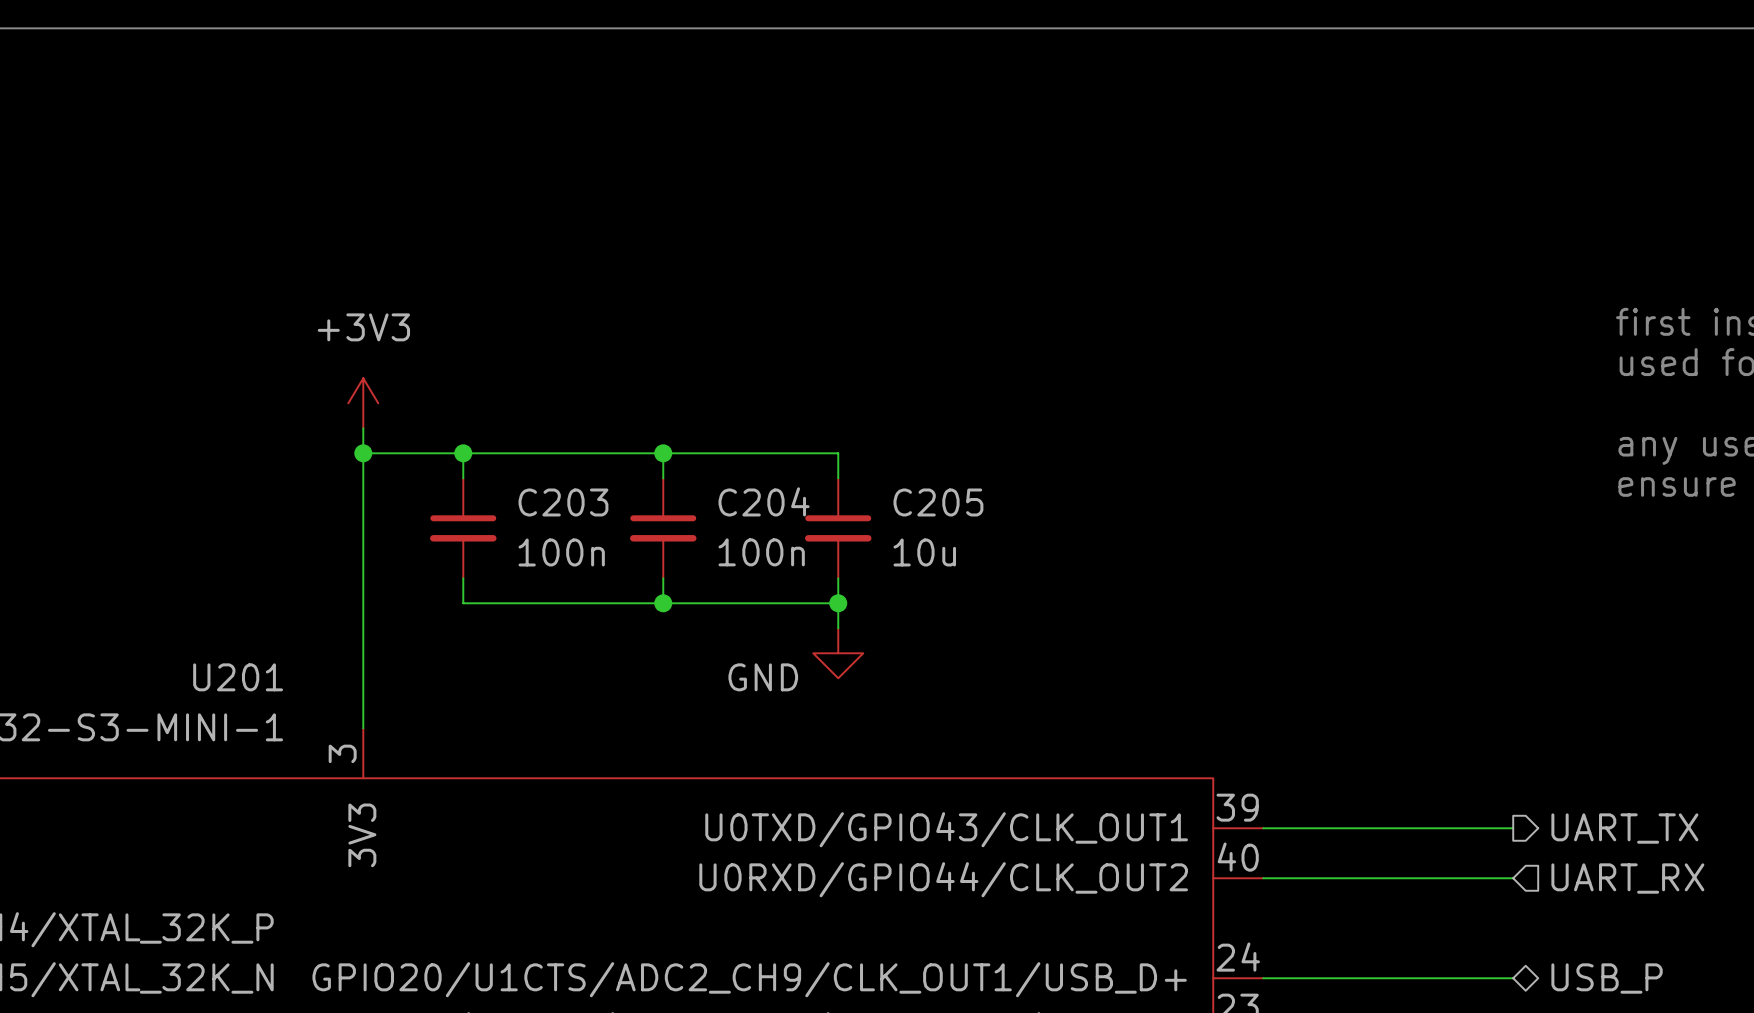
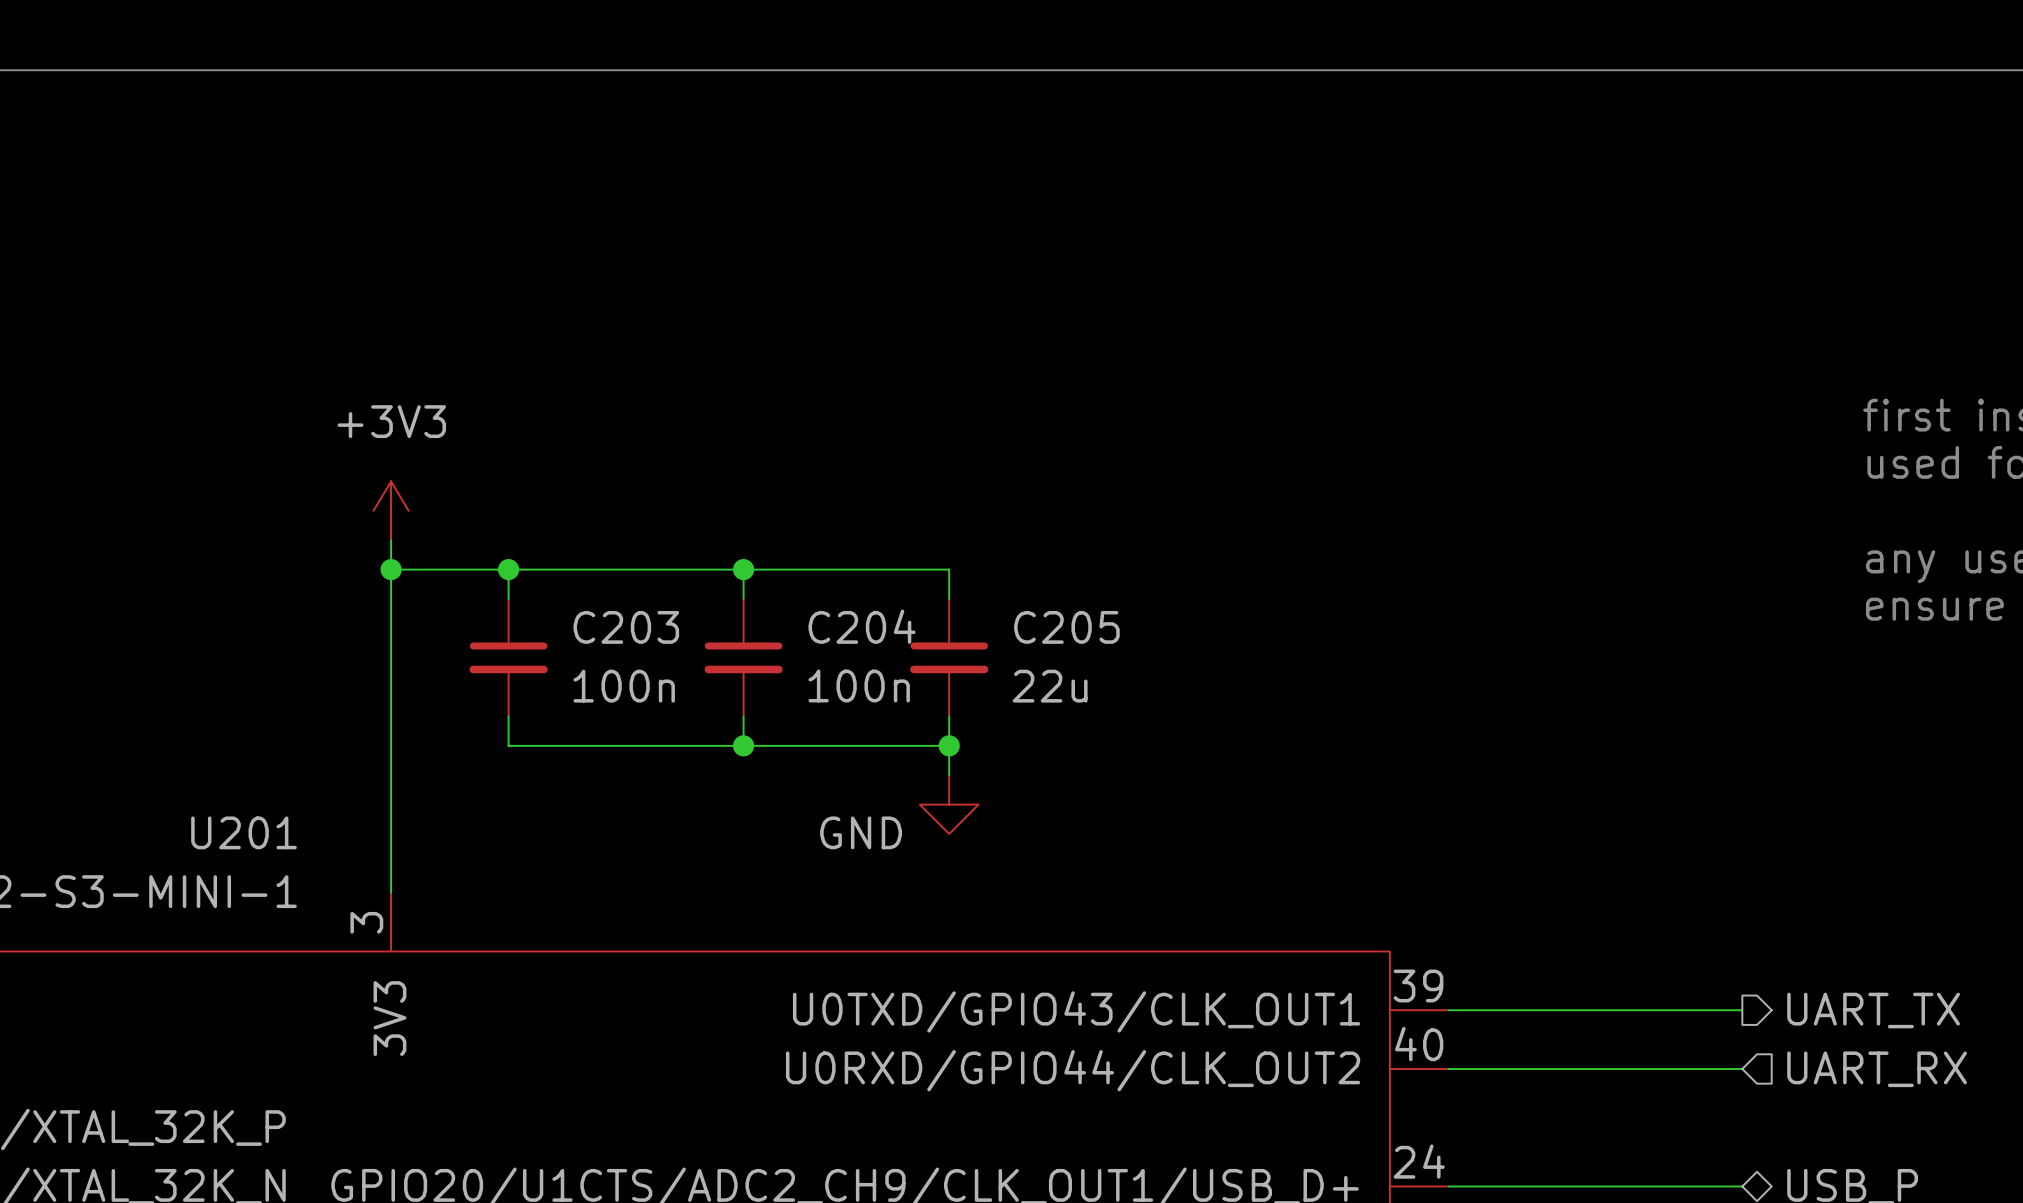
C205 value: 10u (924, 552) -> 22u (1050, 686)

